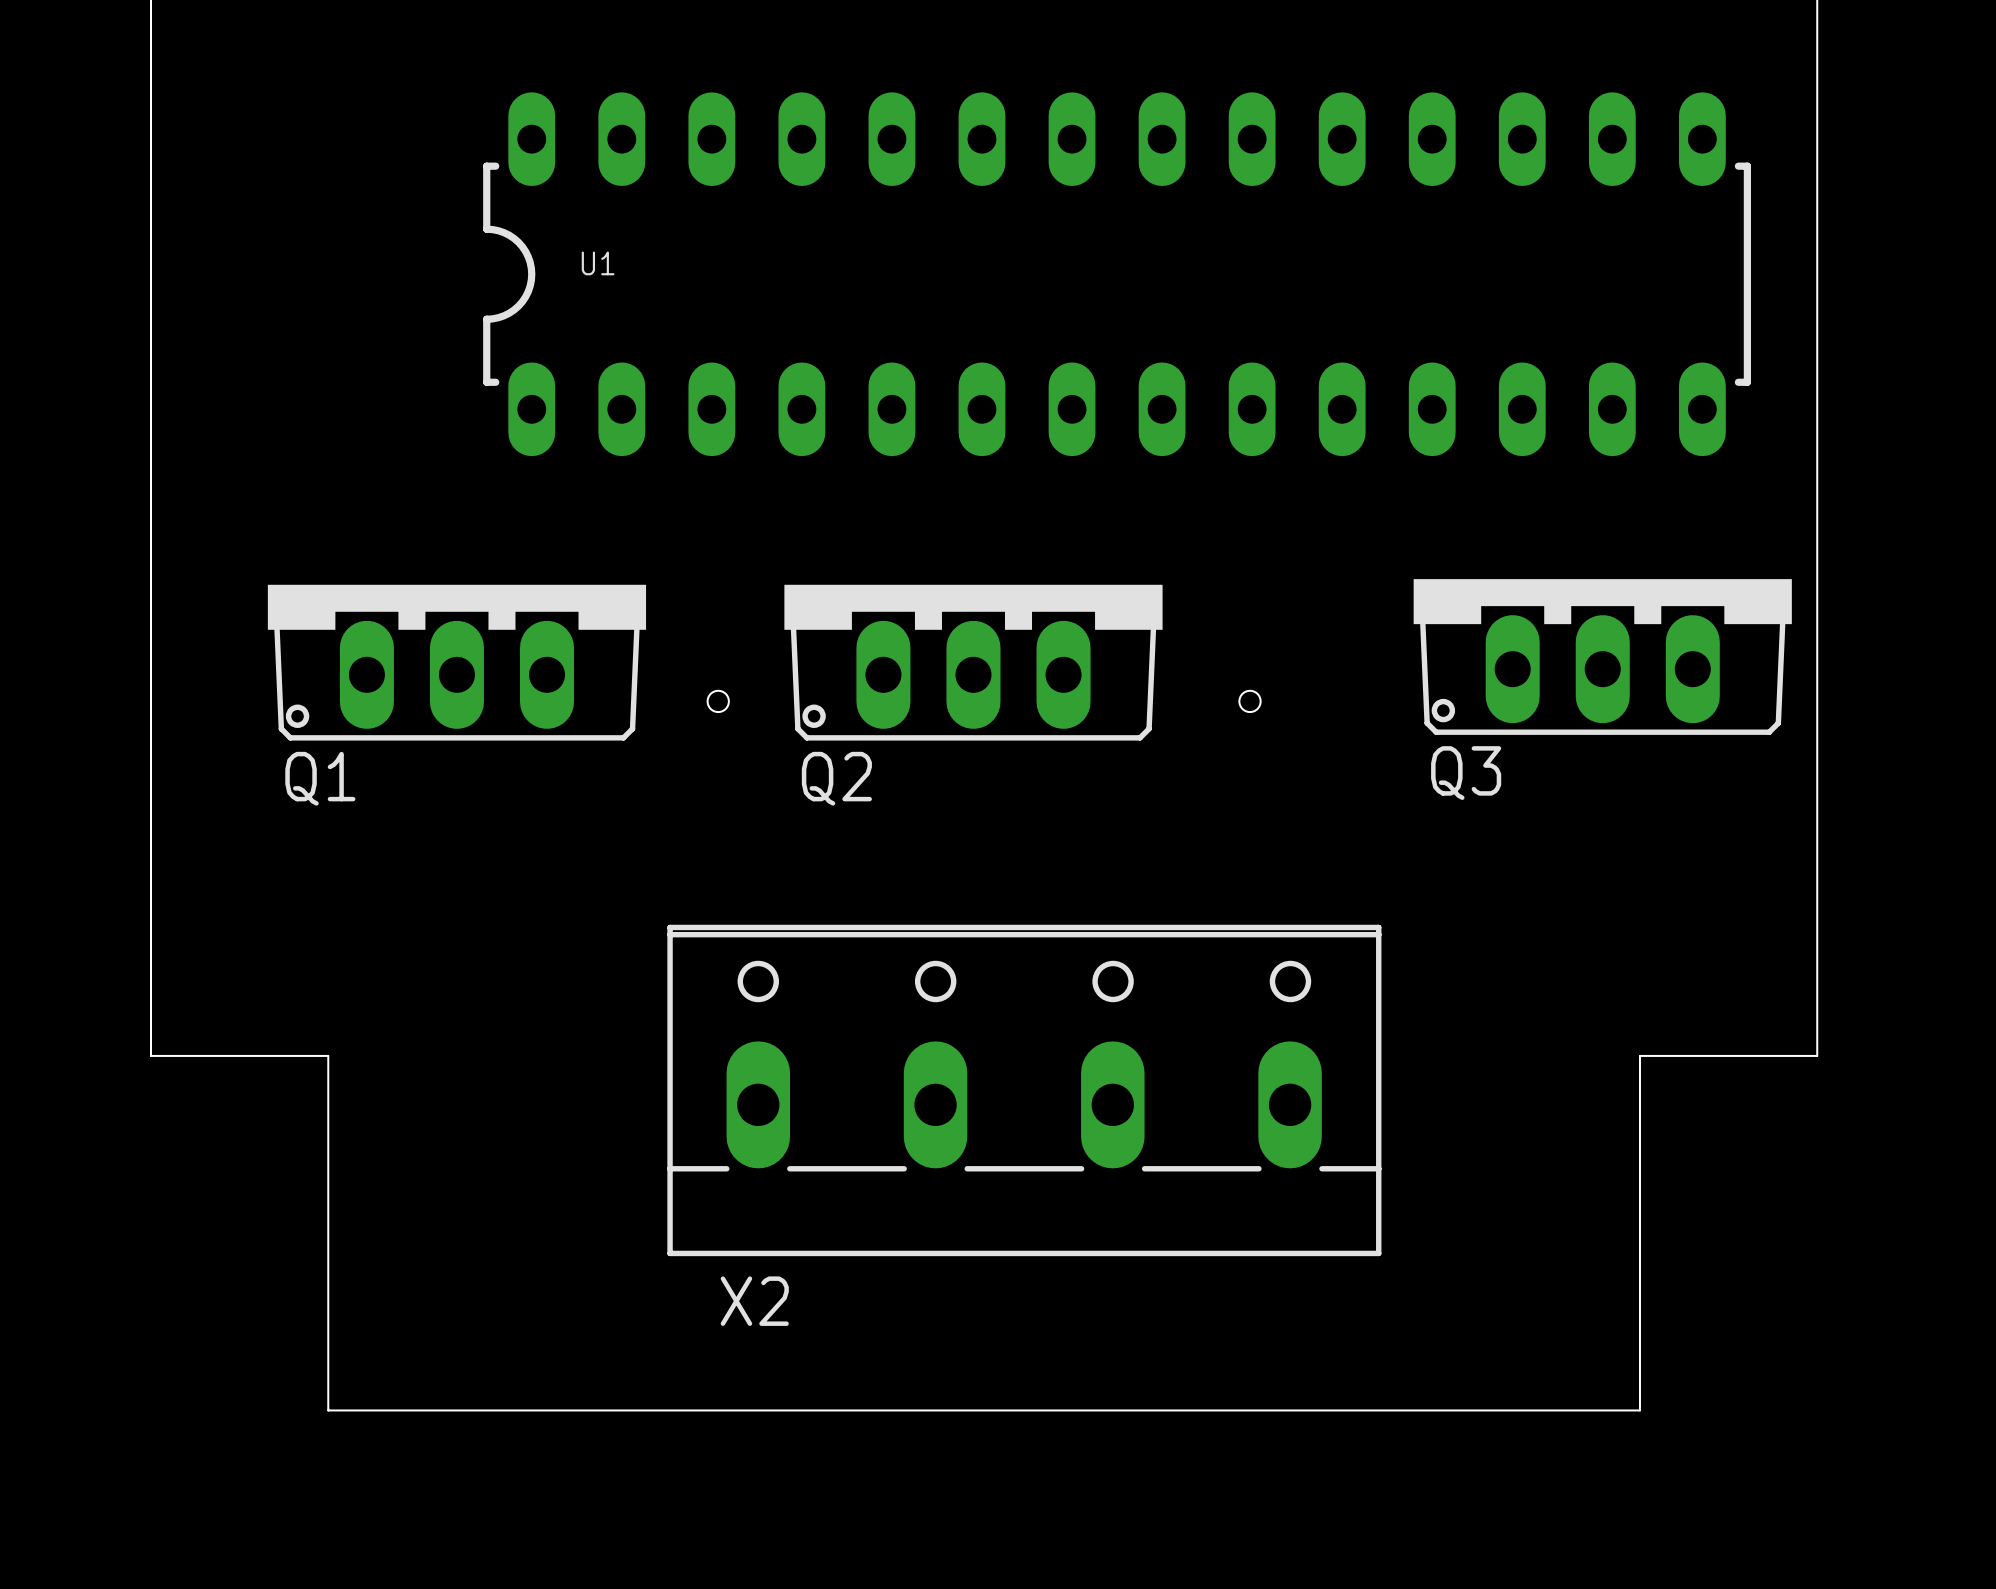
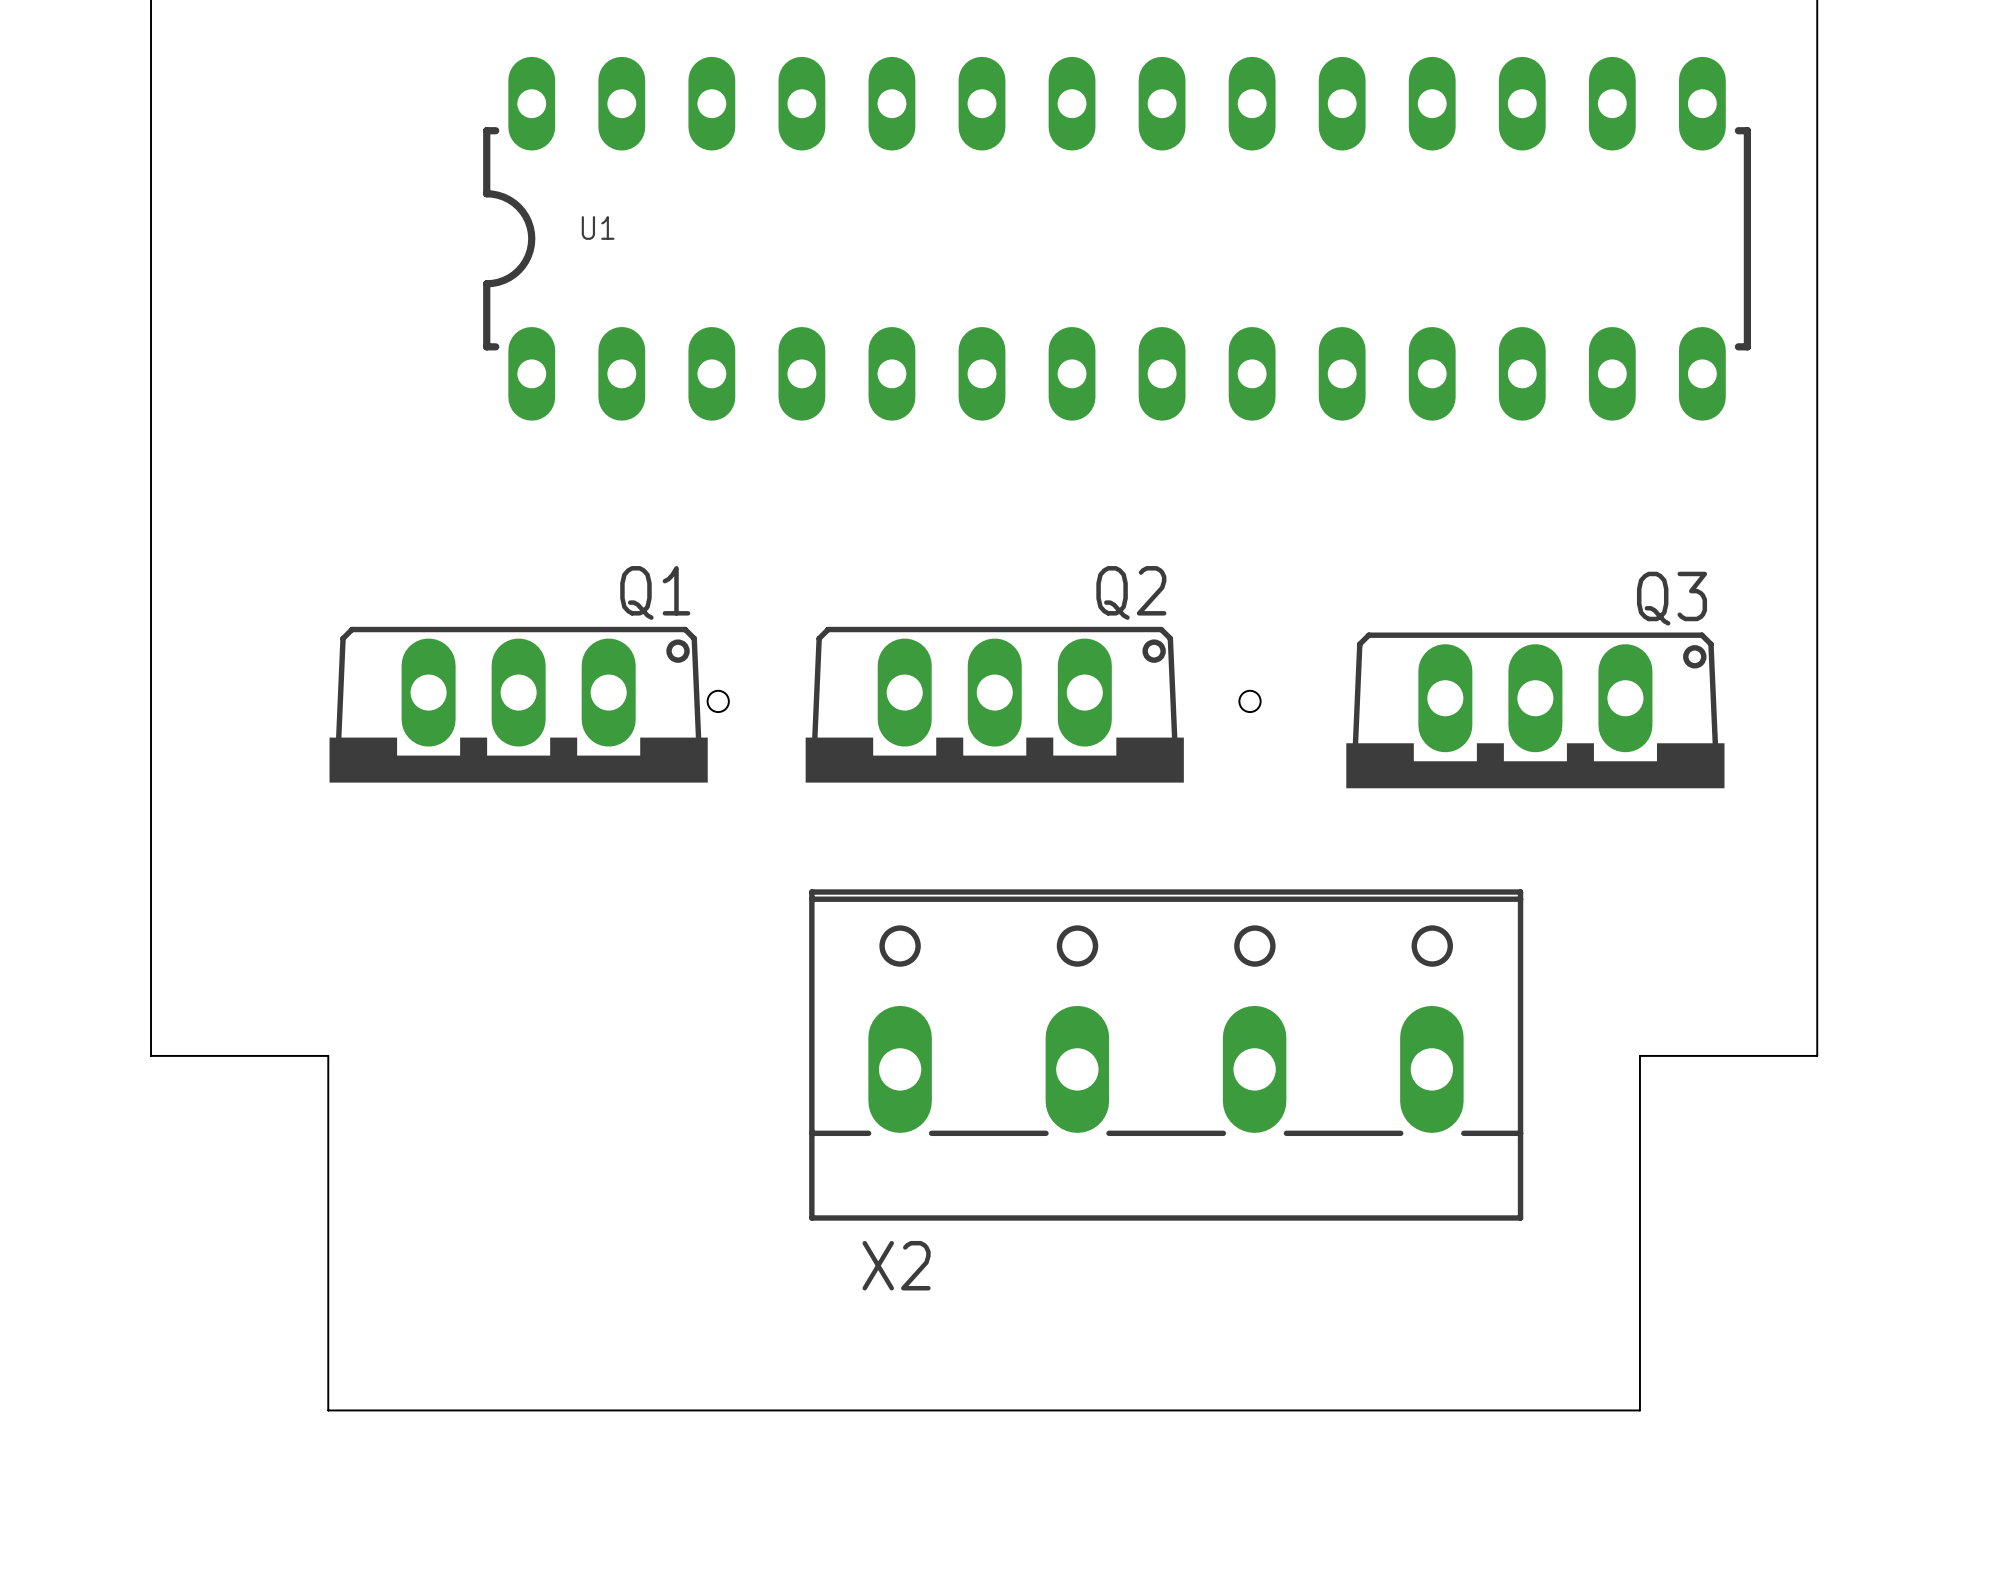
U1 position: (1117, 274) -> (1117, 238)
Q3 rotation: 0° (1602, 657) -> 180° (1535, 710)
Q1 rotation: 0° (456, 662) -> 180° (518, 704)
Q2 rotation: 0° (973, 662) -> 180° (994, 704)
X2 position: (1024, 1090) -> (1166, 1055)

